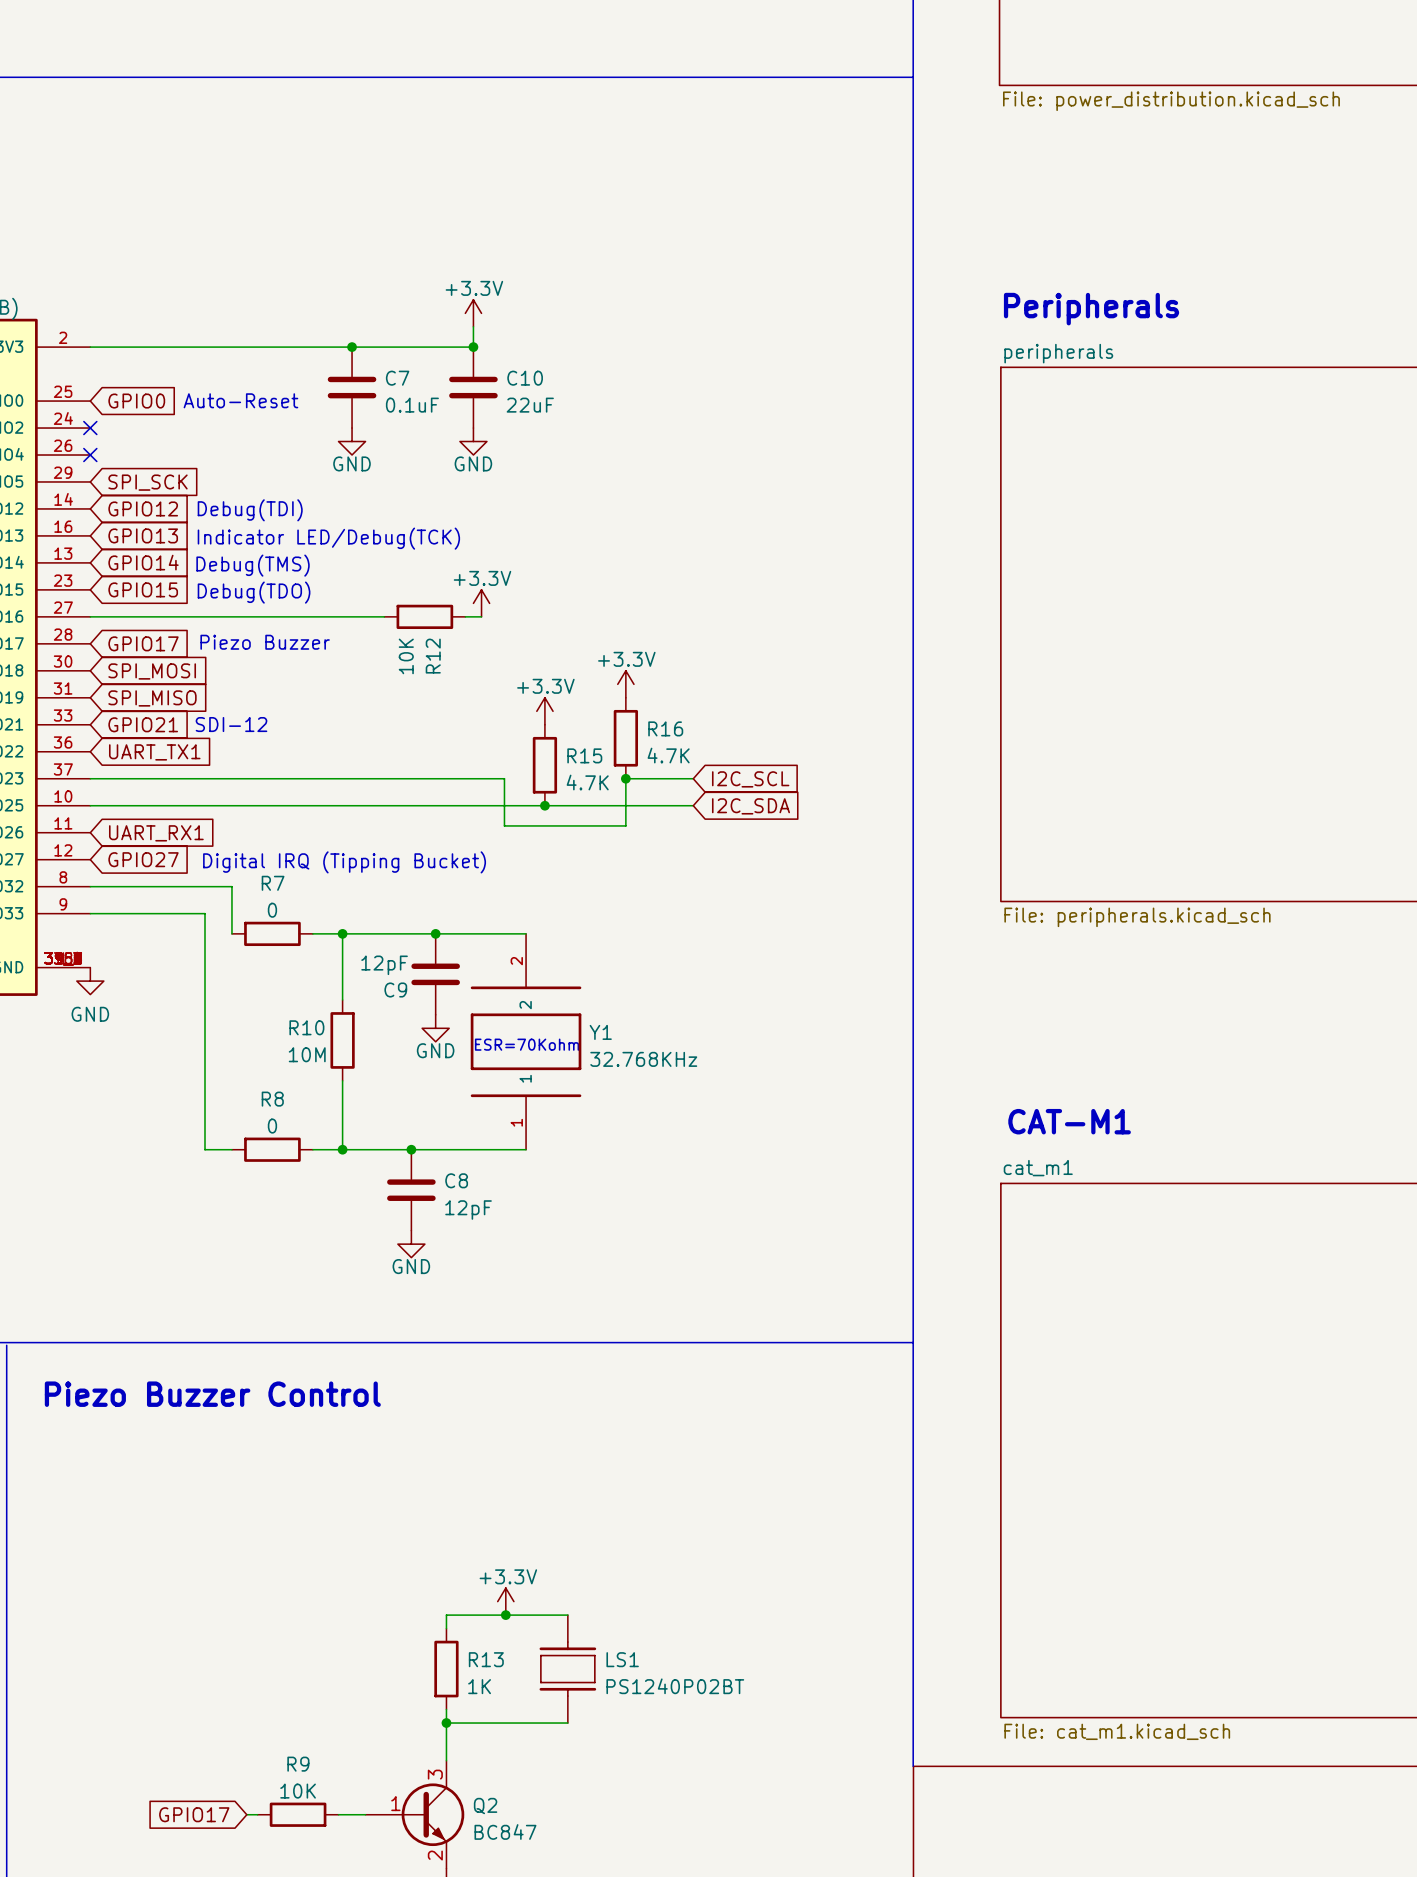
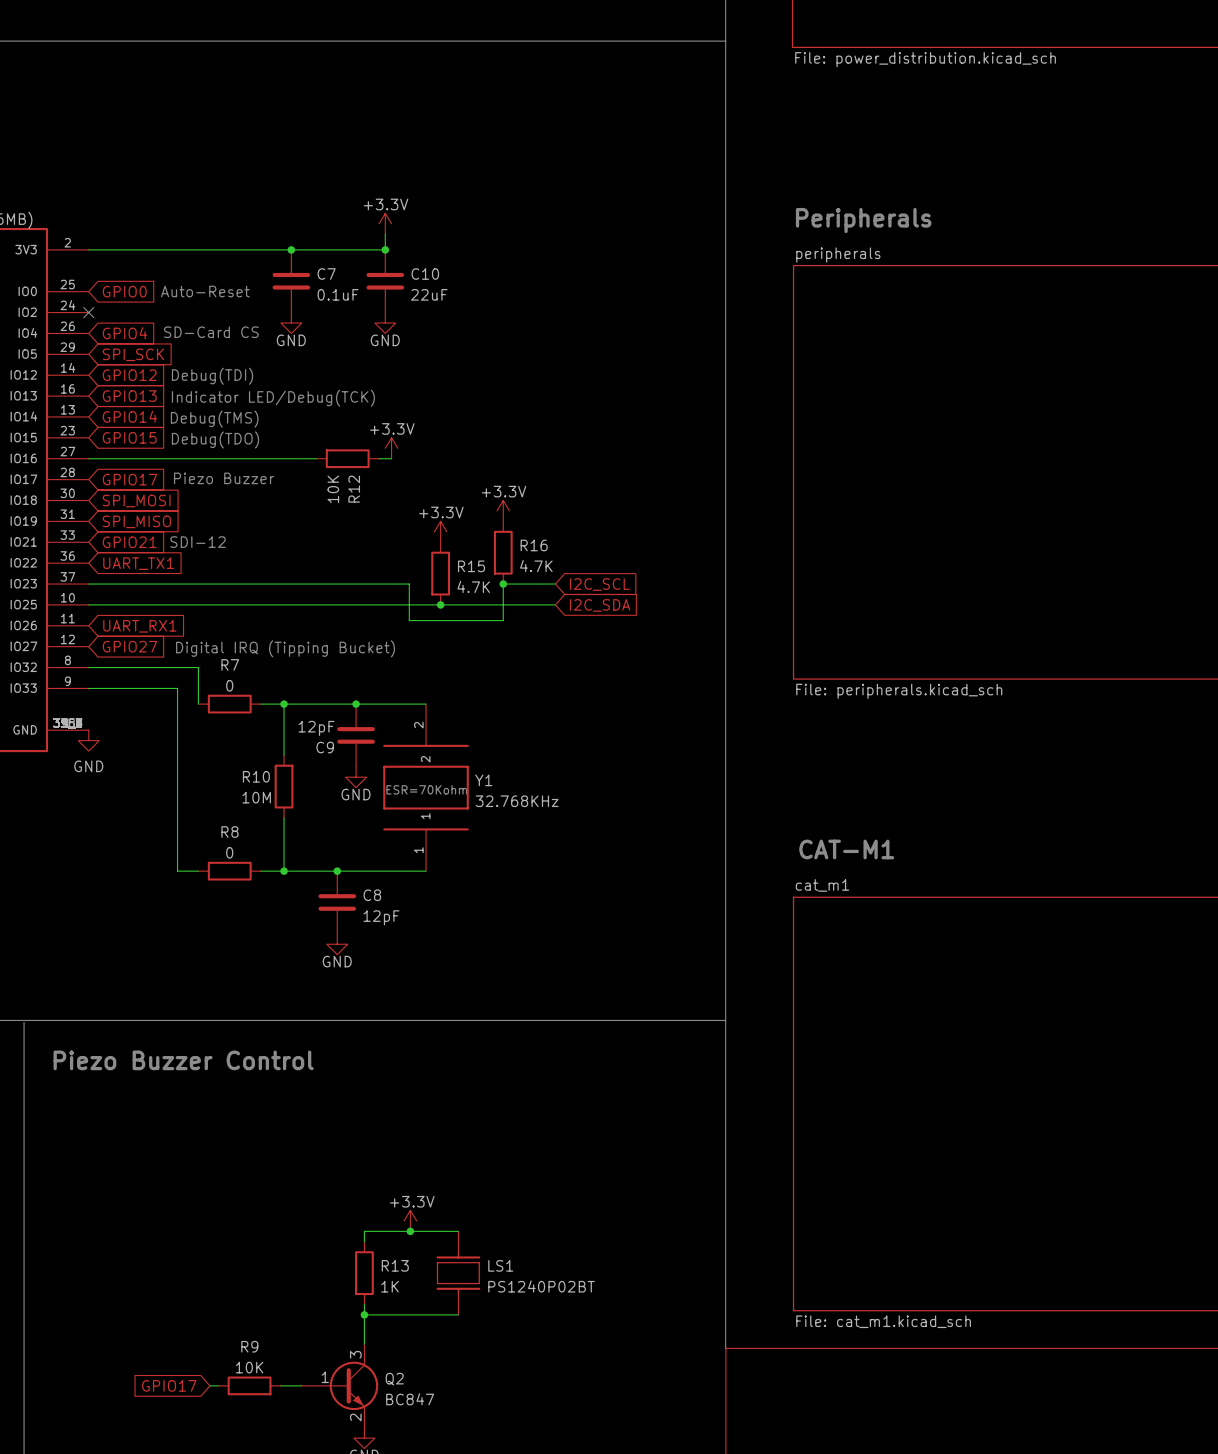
text: none -> SD-Card CS (211, 332)
global label: none -> GPIO4 (124, 333)
no-connect mark: (90, 455) -> none

